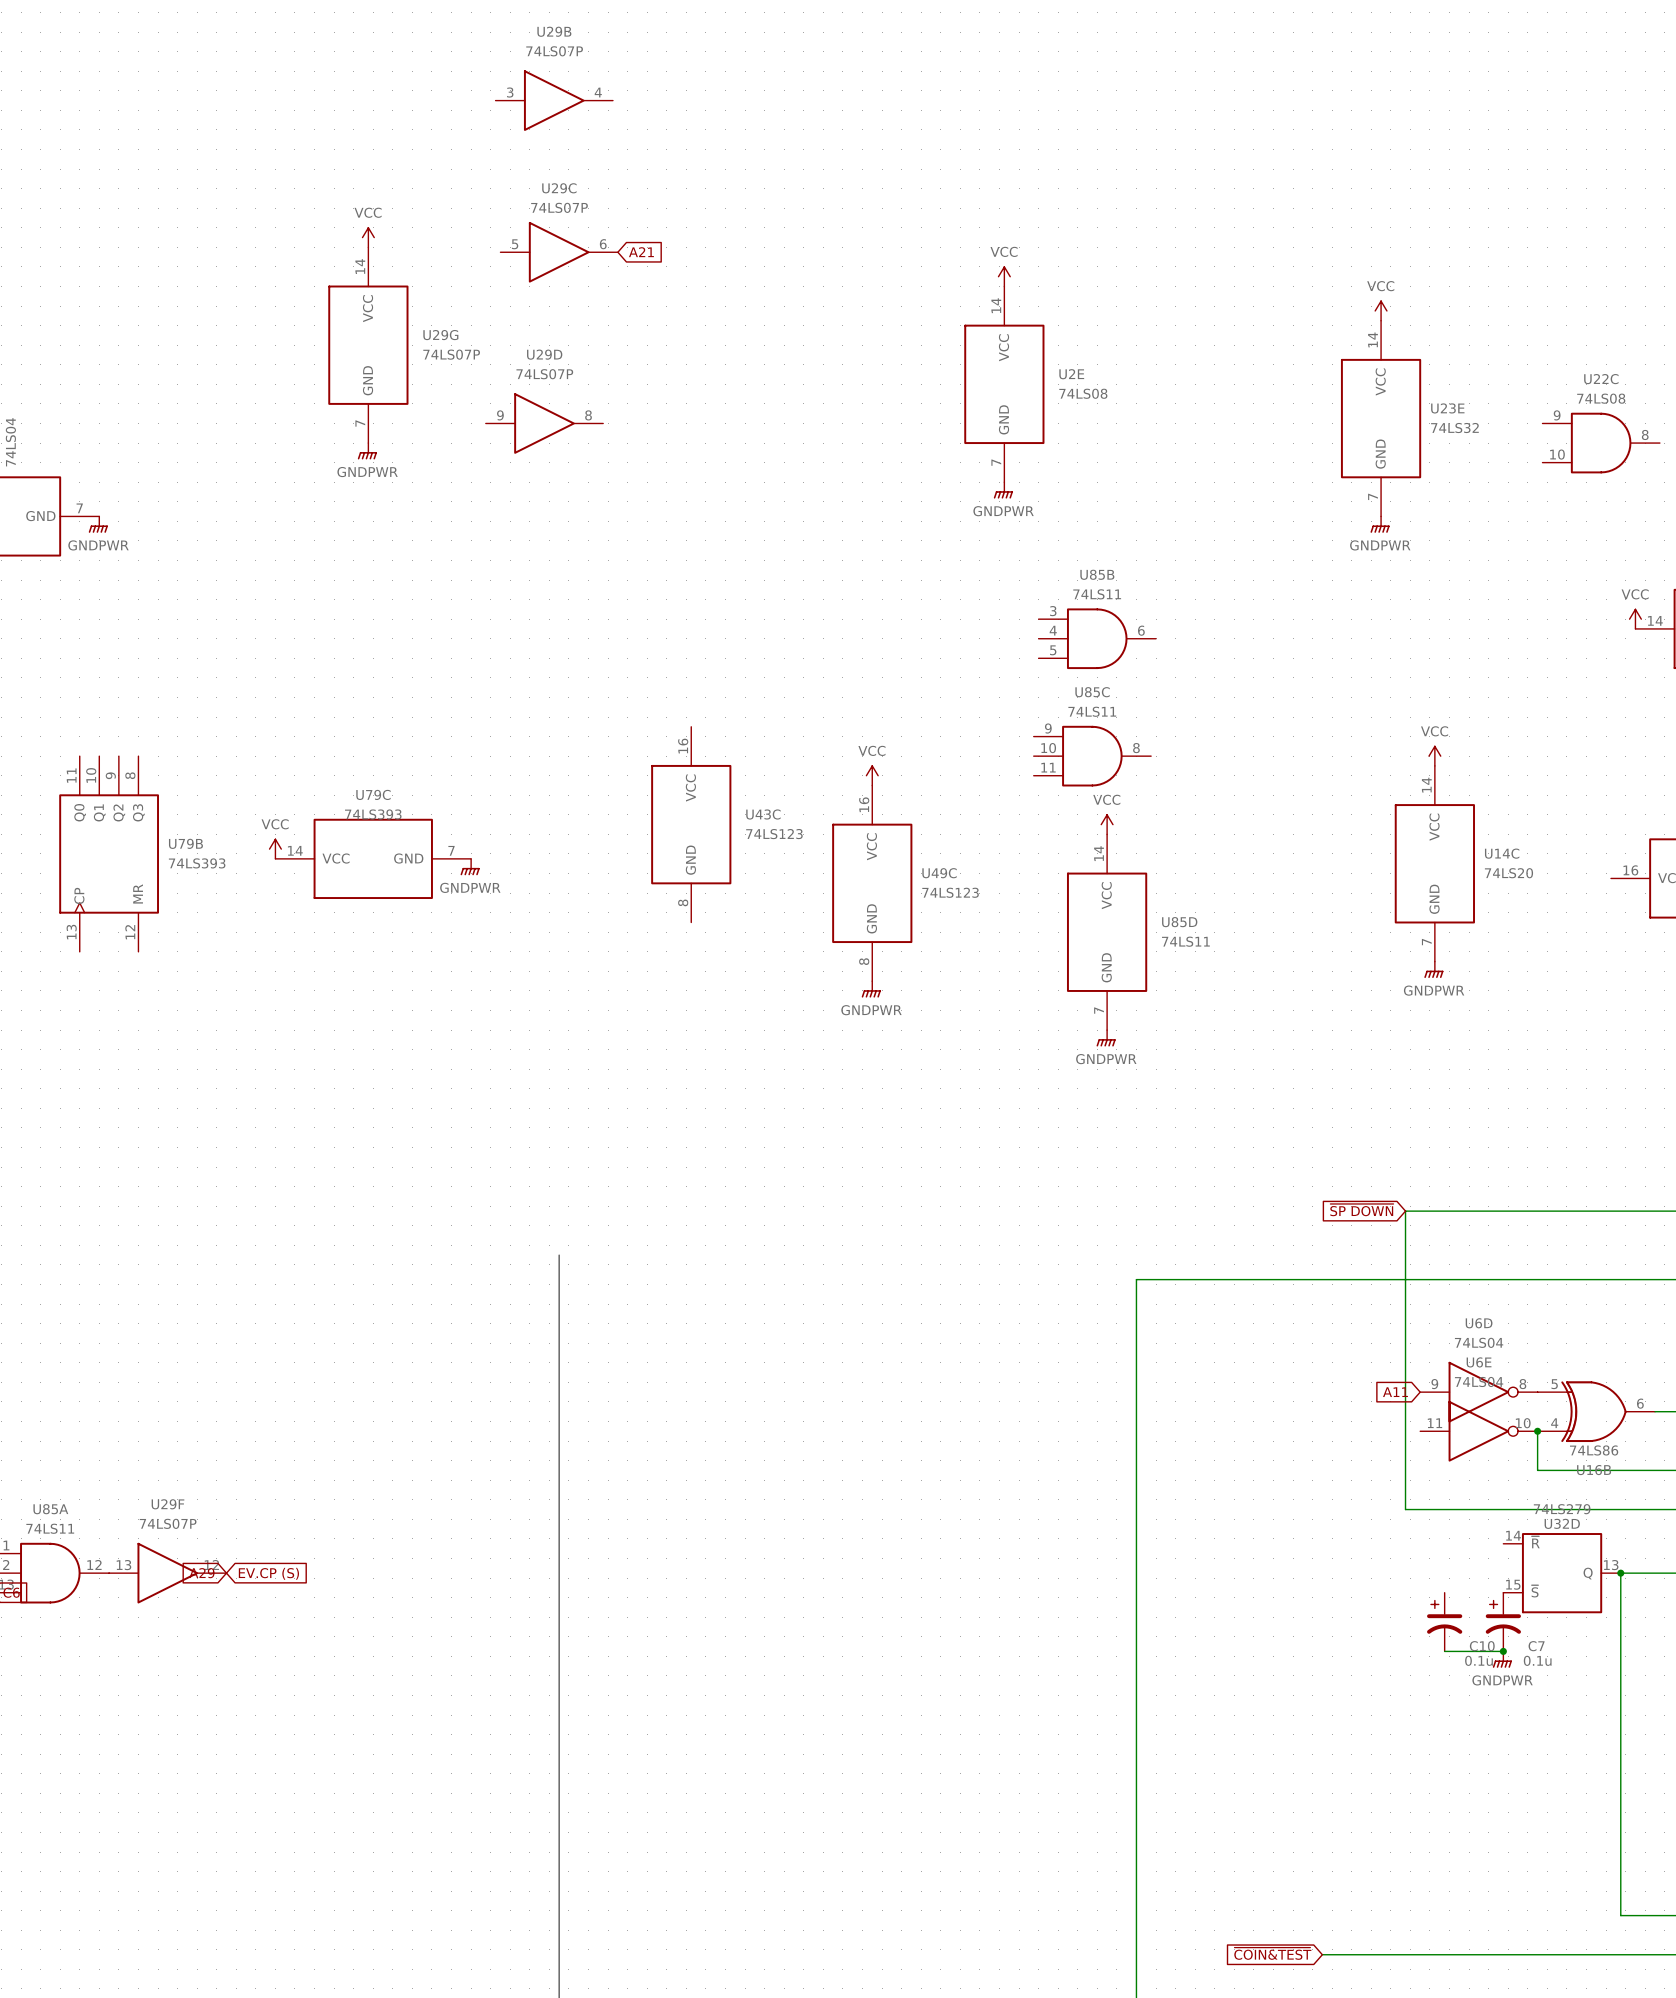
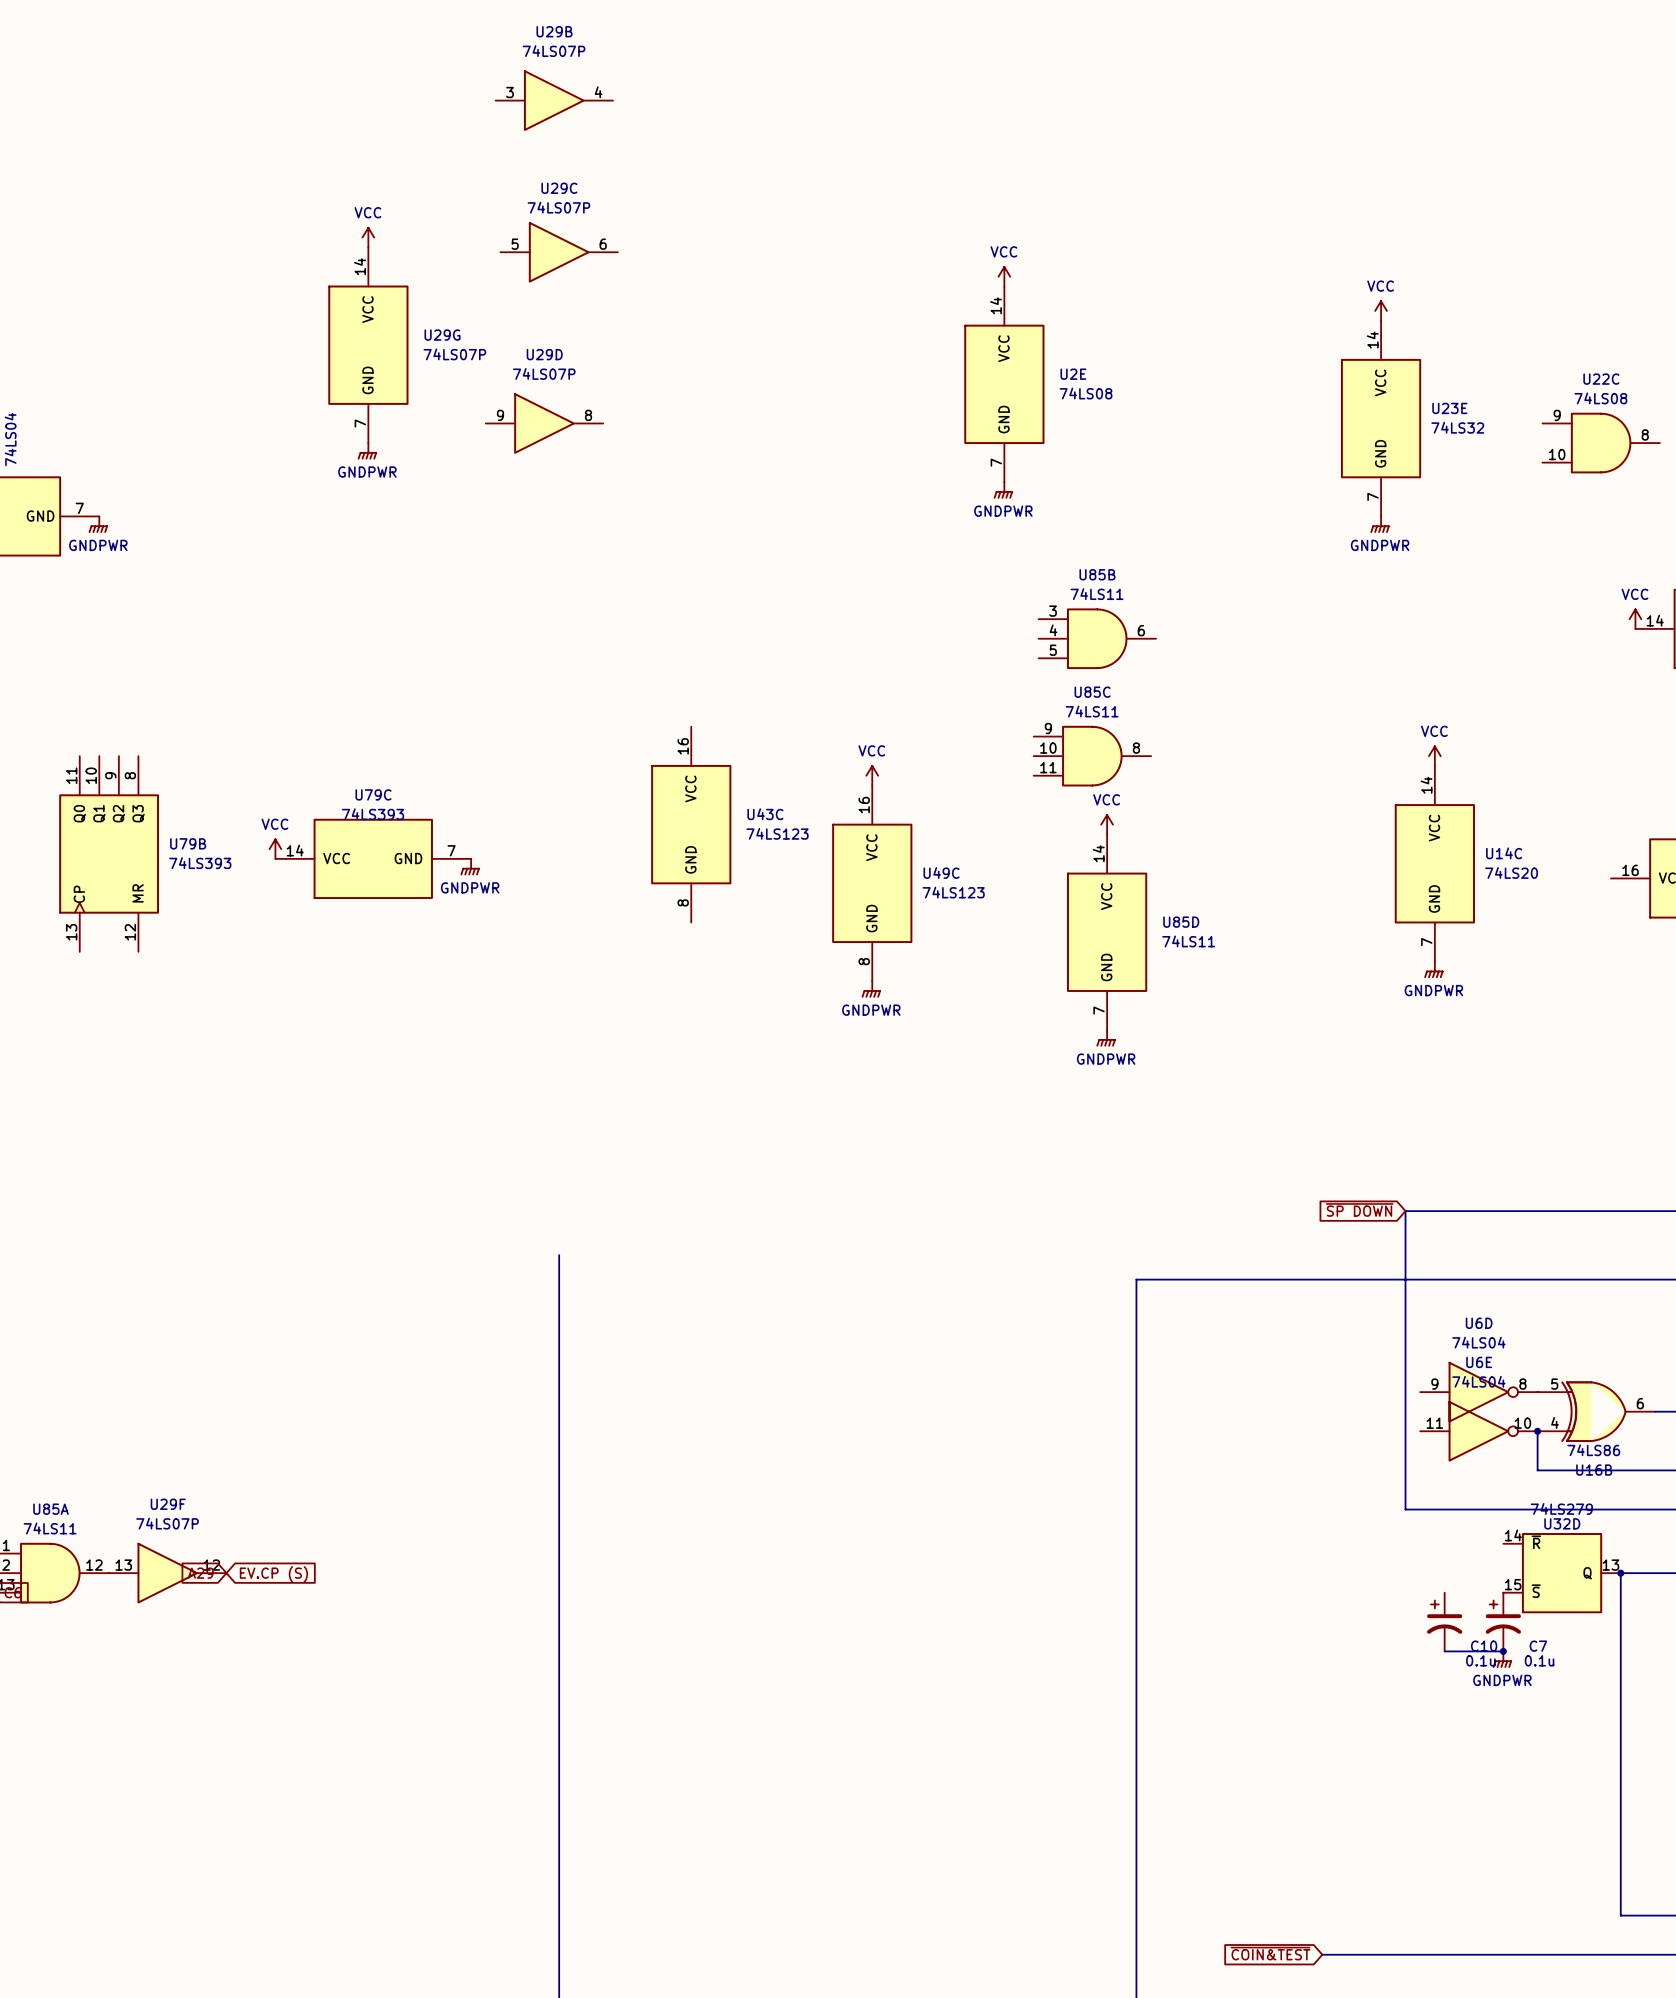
global label: A21 (641, 252) -> none
global label: A11 (1395, 1392) -> none

